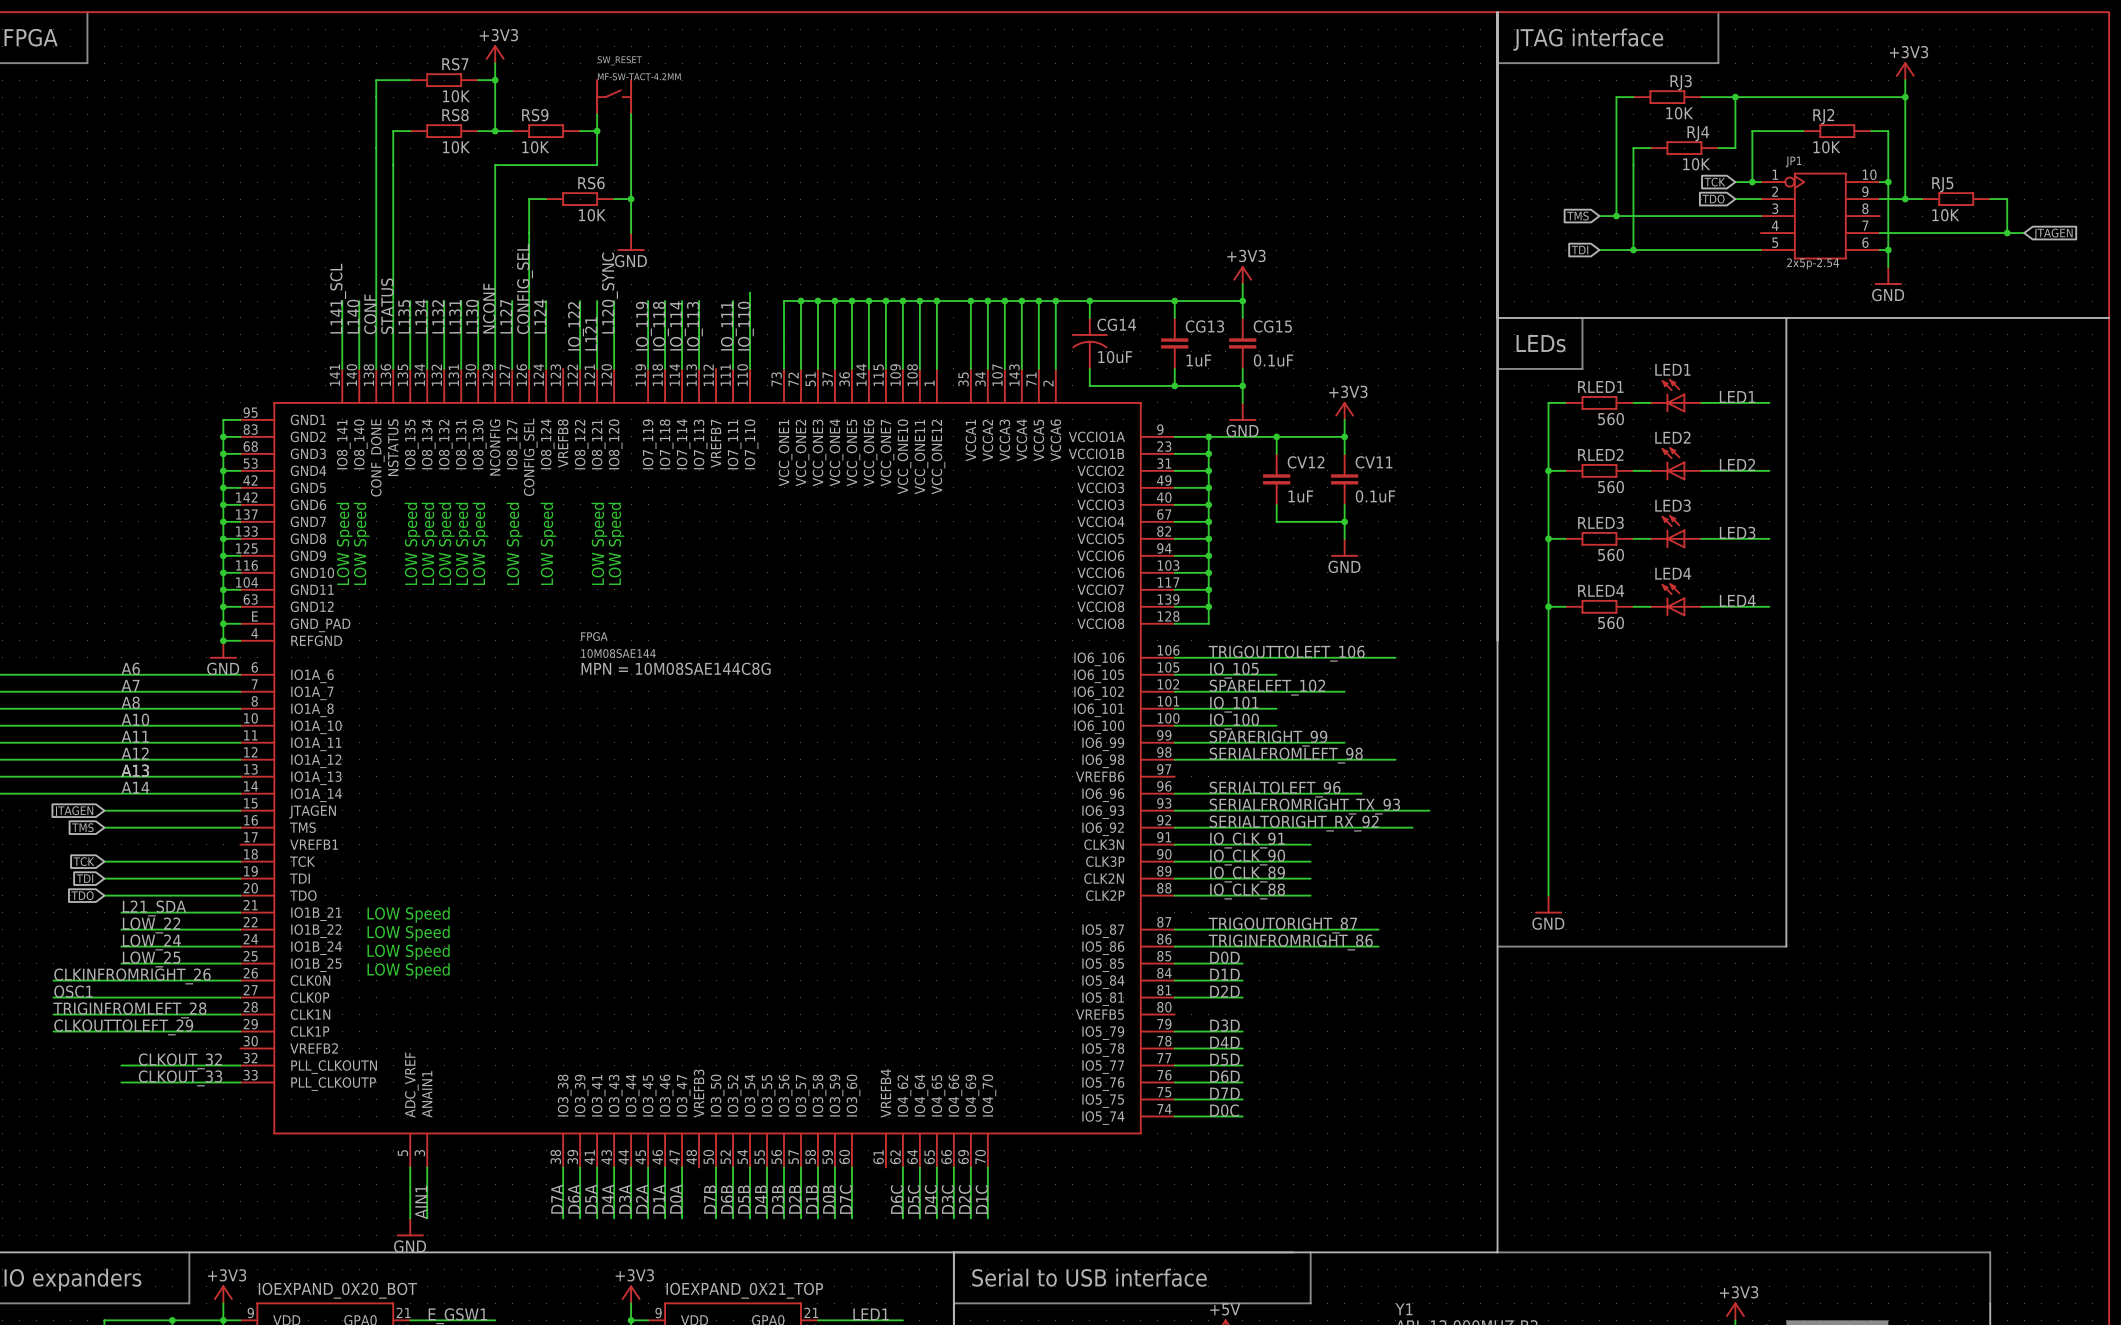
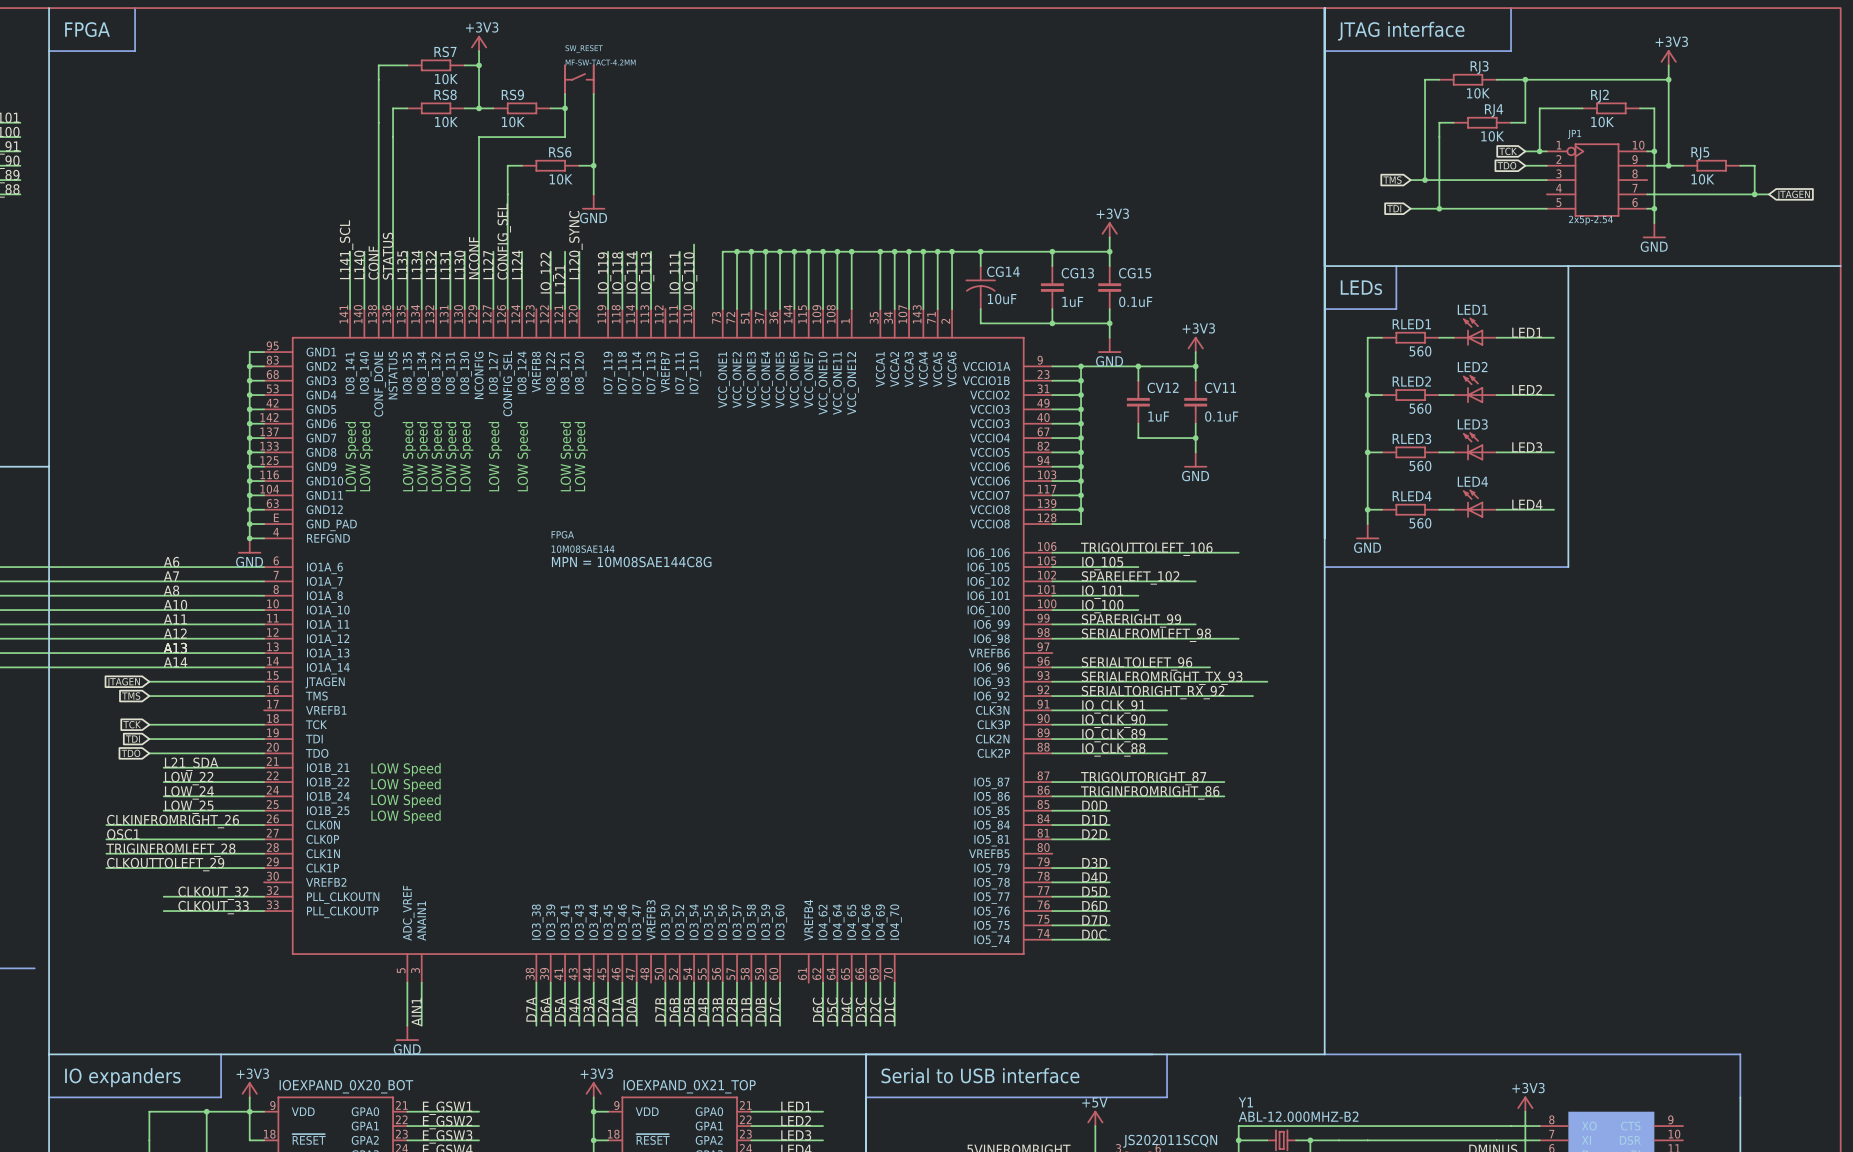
wire: (1548, 623) (1548, 895) -> none
power symbol: none -> GND (1367, 531)
line: none -> (1324, 567) (1568, 567)
line: (1786, 674) (1786, 946) -> none
power symbol: GND (1548, 904) -> none
line: (1497, 946) (1786, 946) -> none

